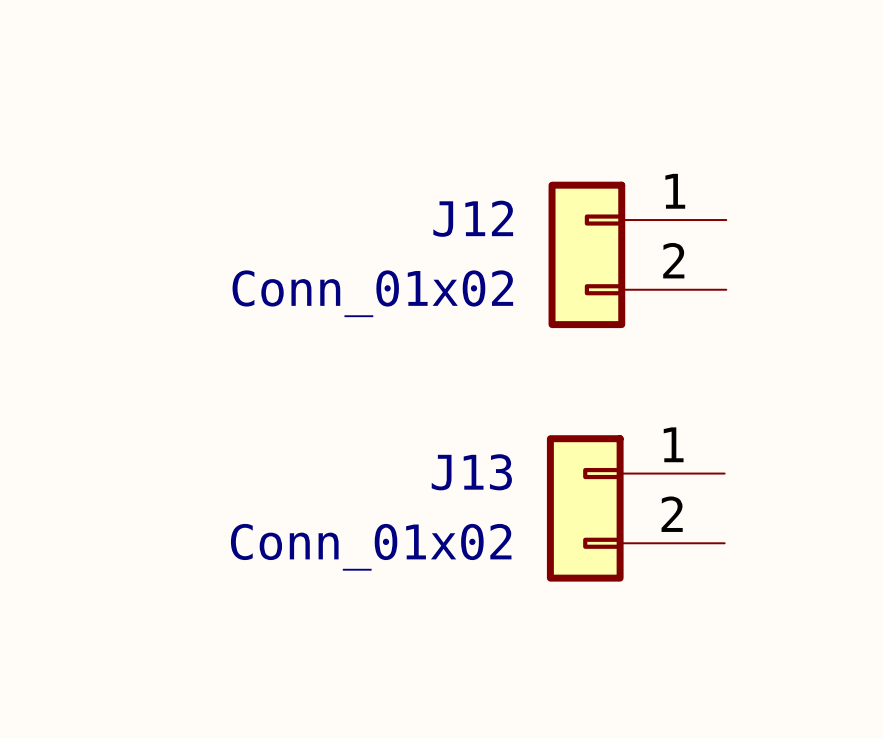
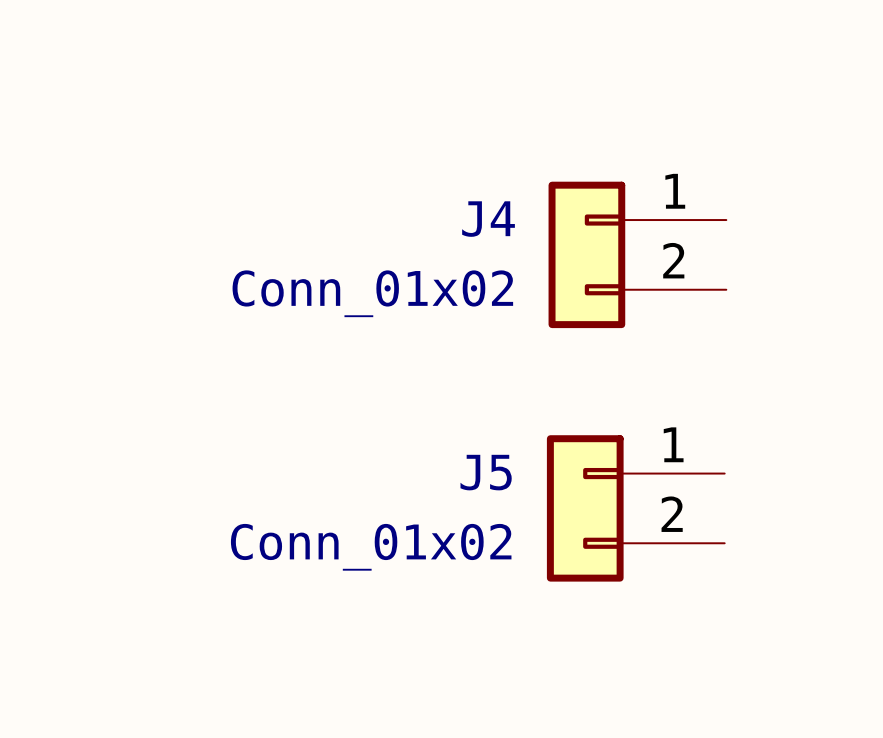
J12 name: J12 (473, 218) -> J4 (488, 219)
J13 name: J13 (471, 472) -> J5 (486, 472)

